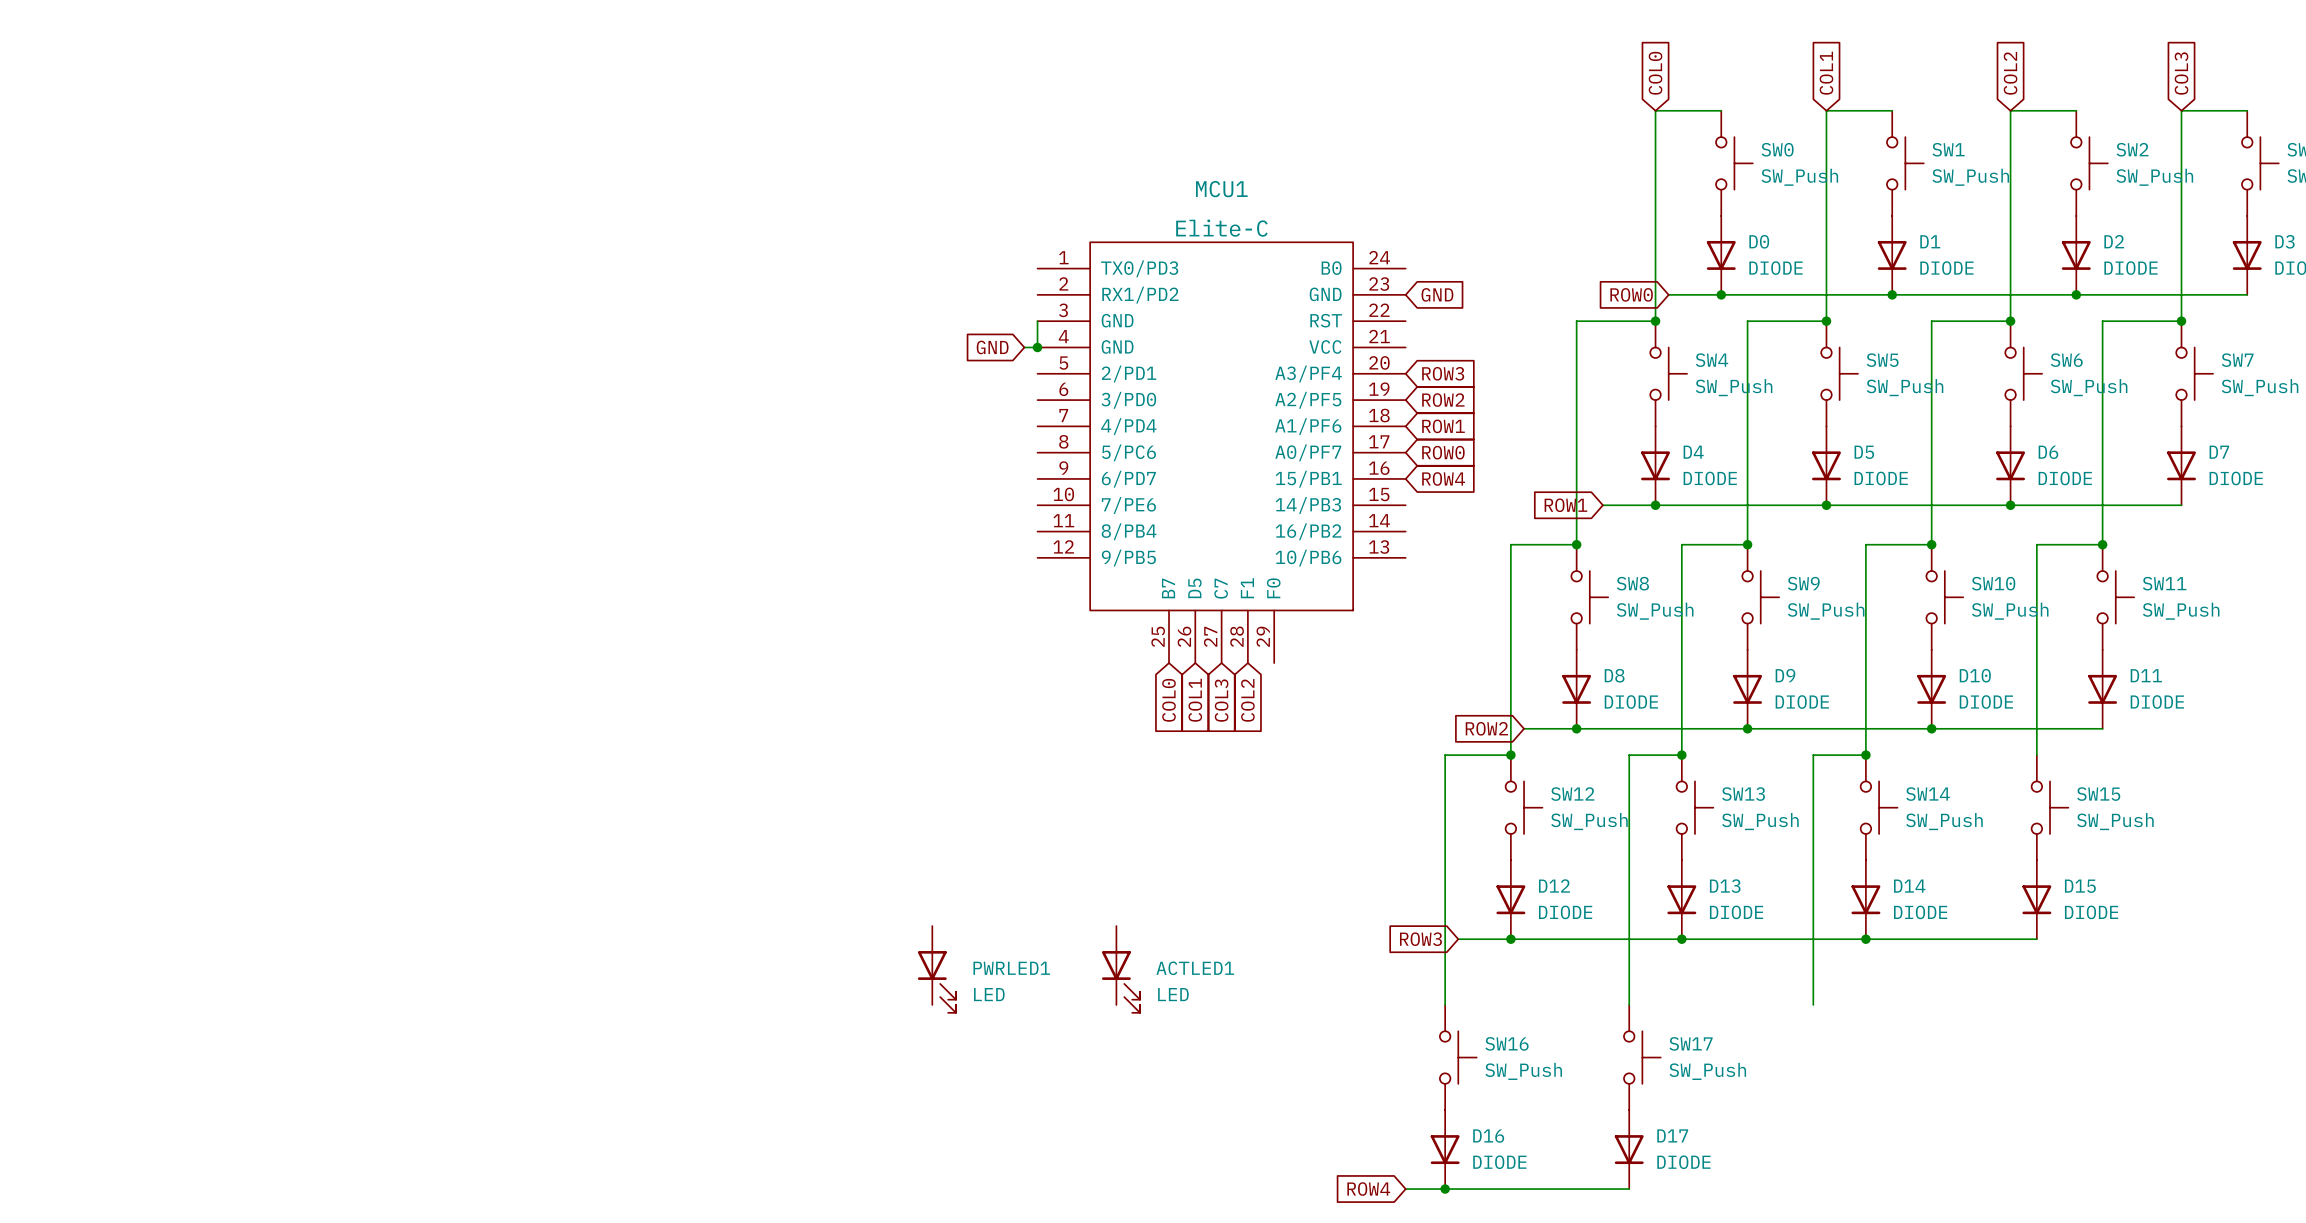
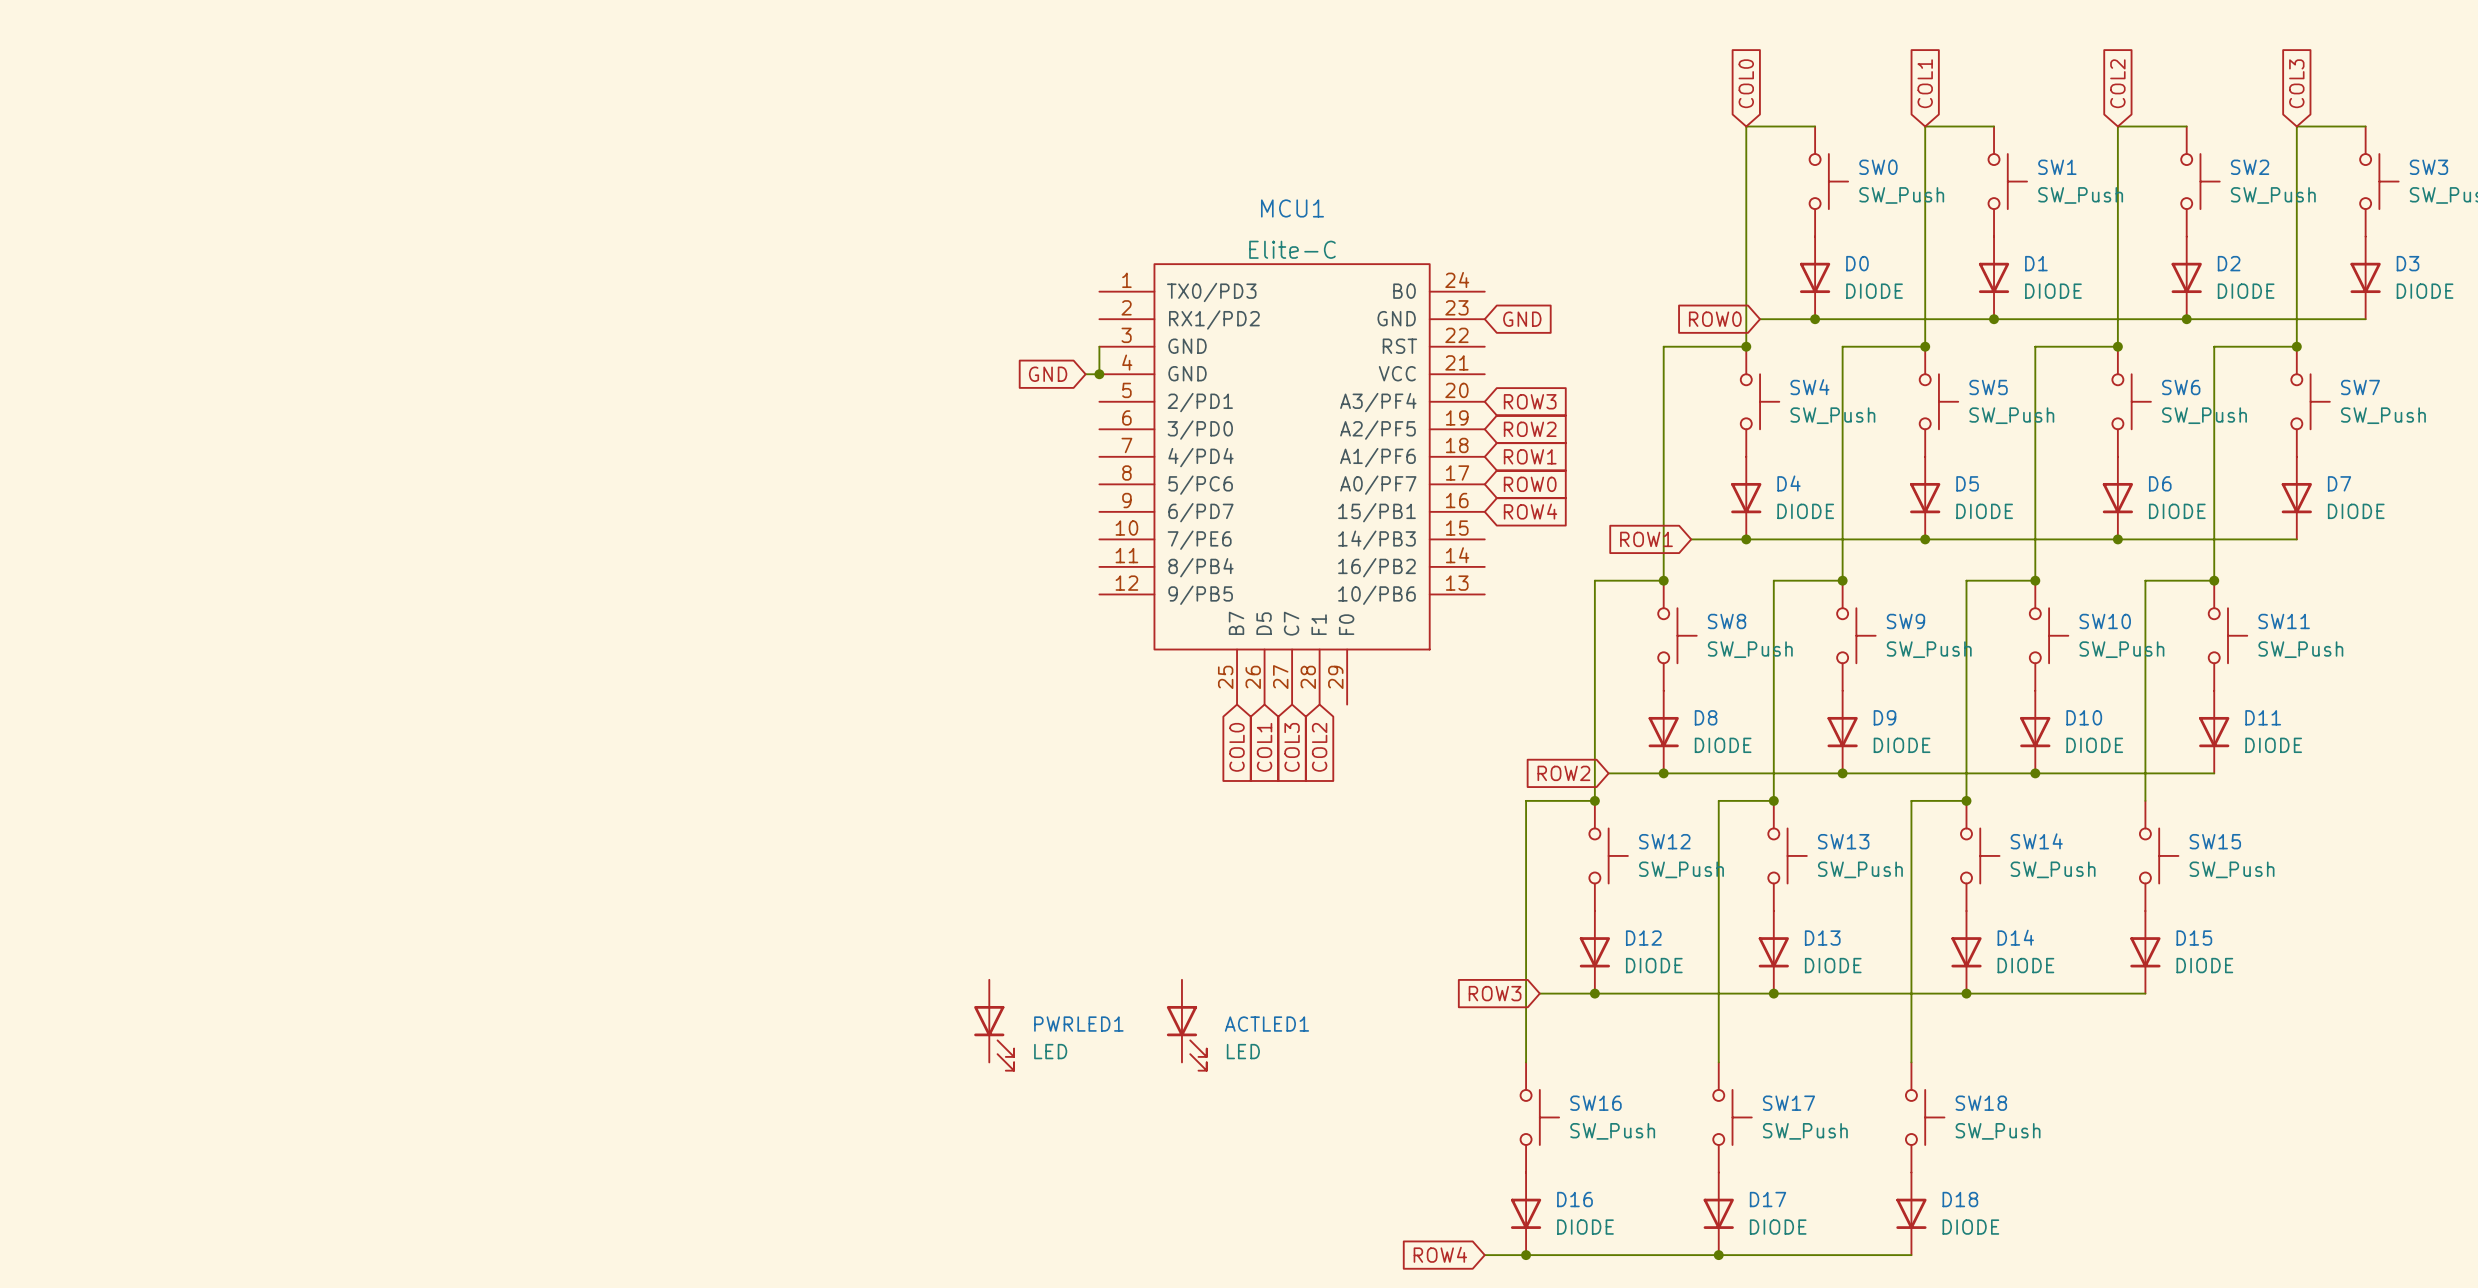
SW18: none -> SW_Push (1925, 1117)
D18: none -> DIODE (1911, 1213)
wire: none -> (1718, 1255) (1911, 1255)
junction: none -> (1718, 1255)

